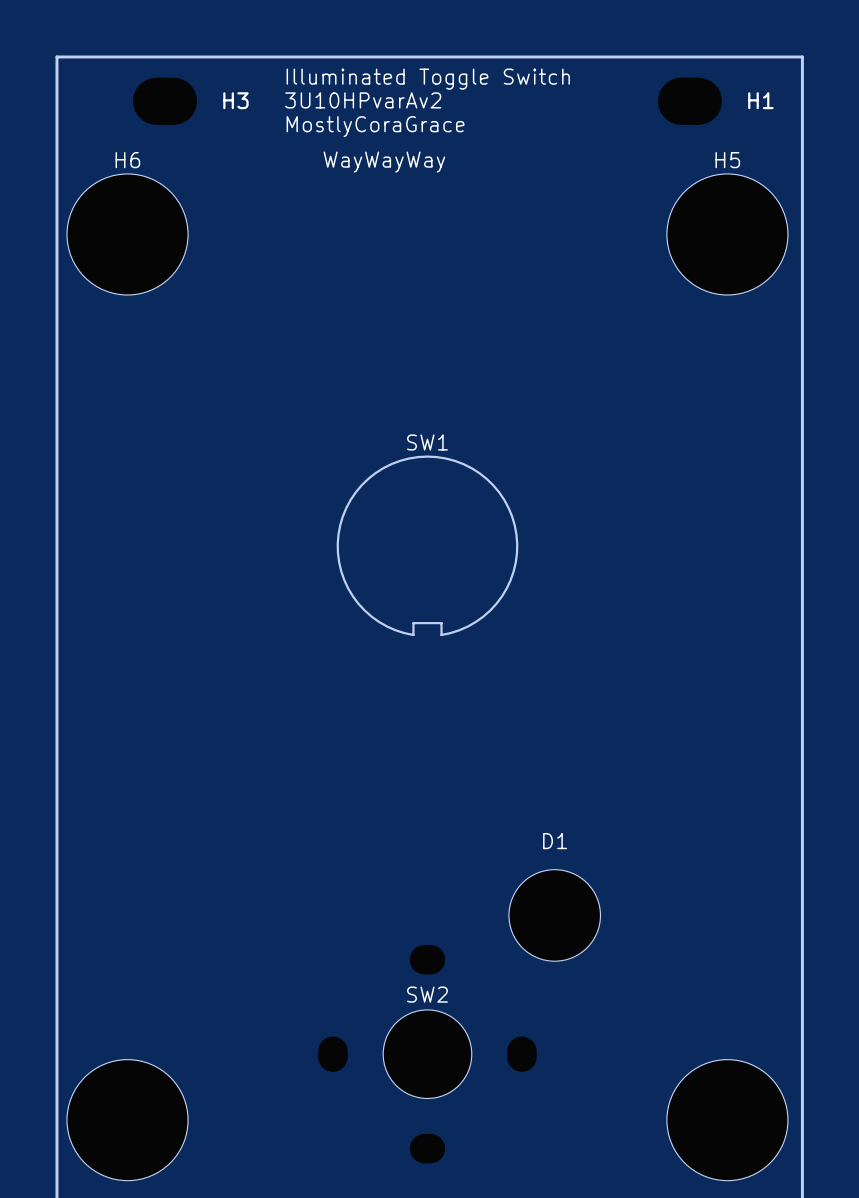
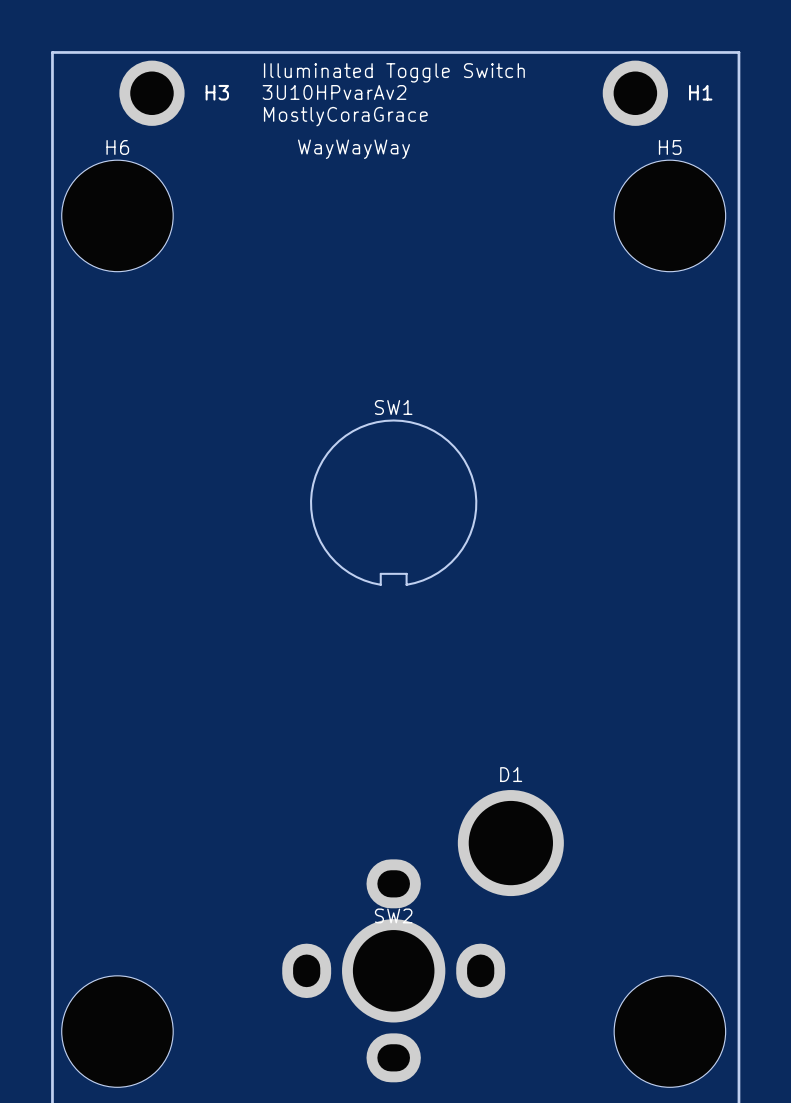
H3 footprint: [133, 77, 198, 125] -> [119, 60, 185, 126]
H1 footprint: [657, 77, 722, 125] -> [602, 60, 669, 126]
D1 footprint: [508, 869, 601, 962] -> [457, 790, 564, 897]
SW2 footprint: [318, 944, 537, 1164] -> [282, 859, 506, 1083]

